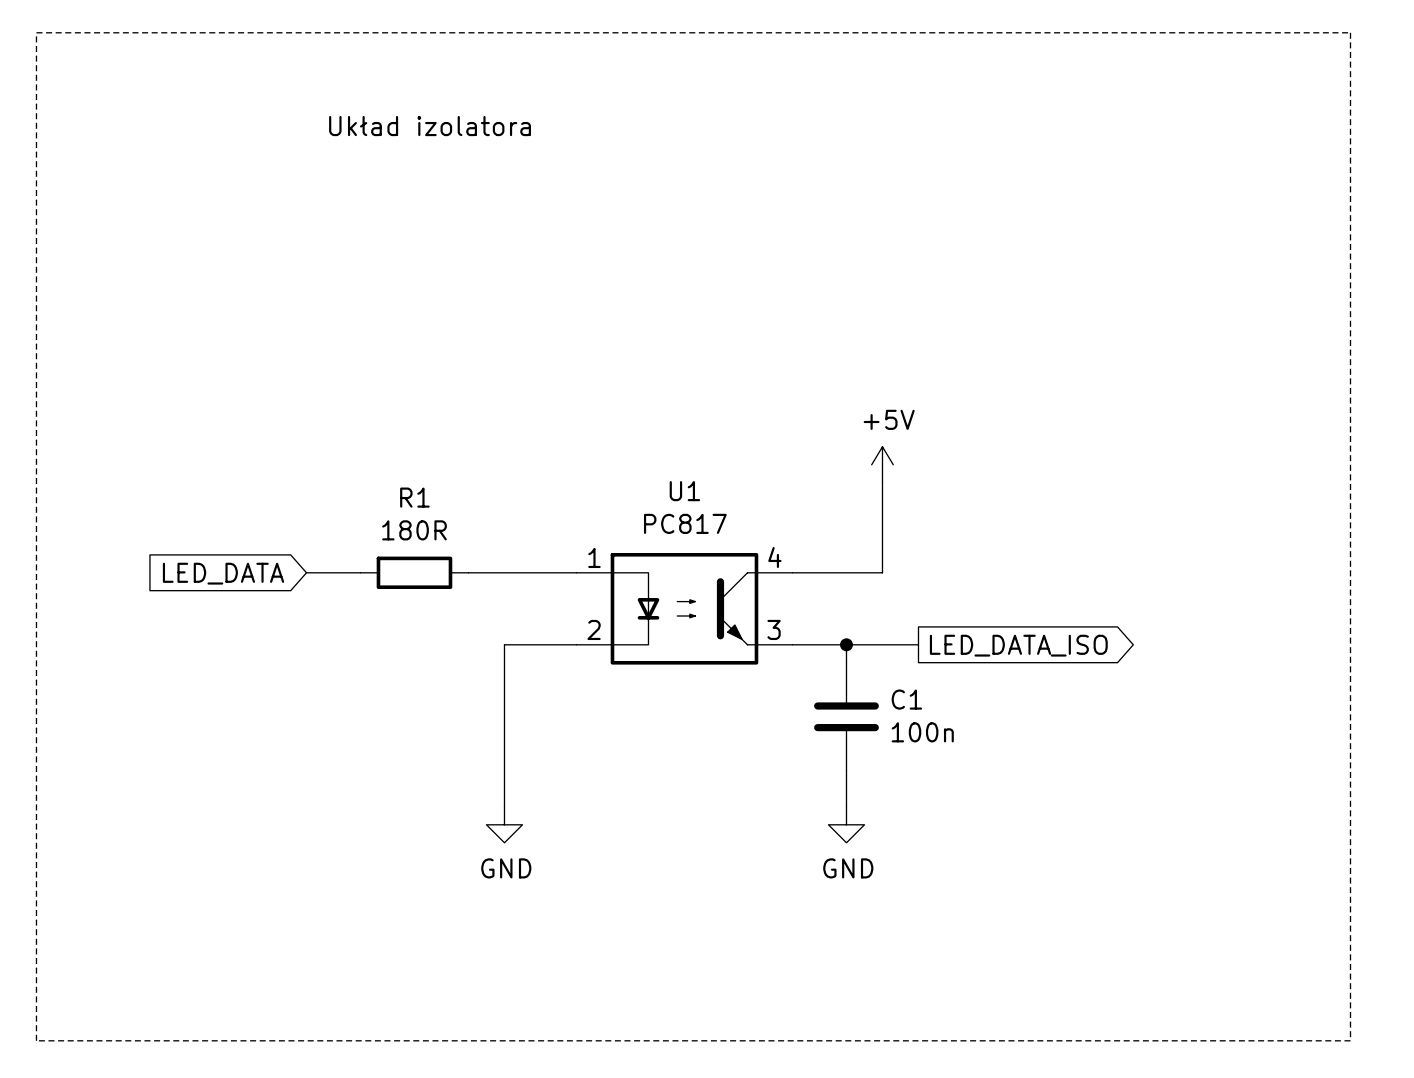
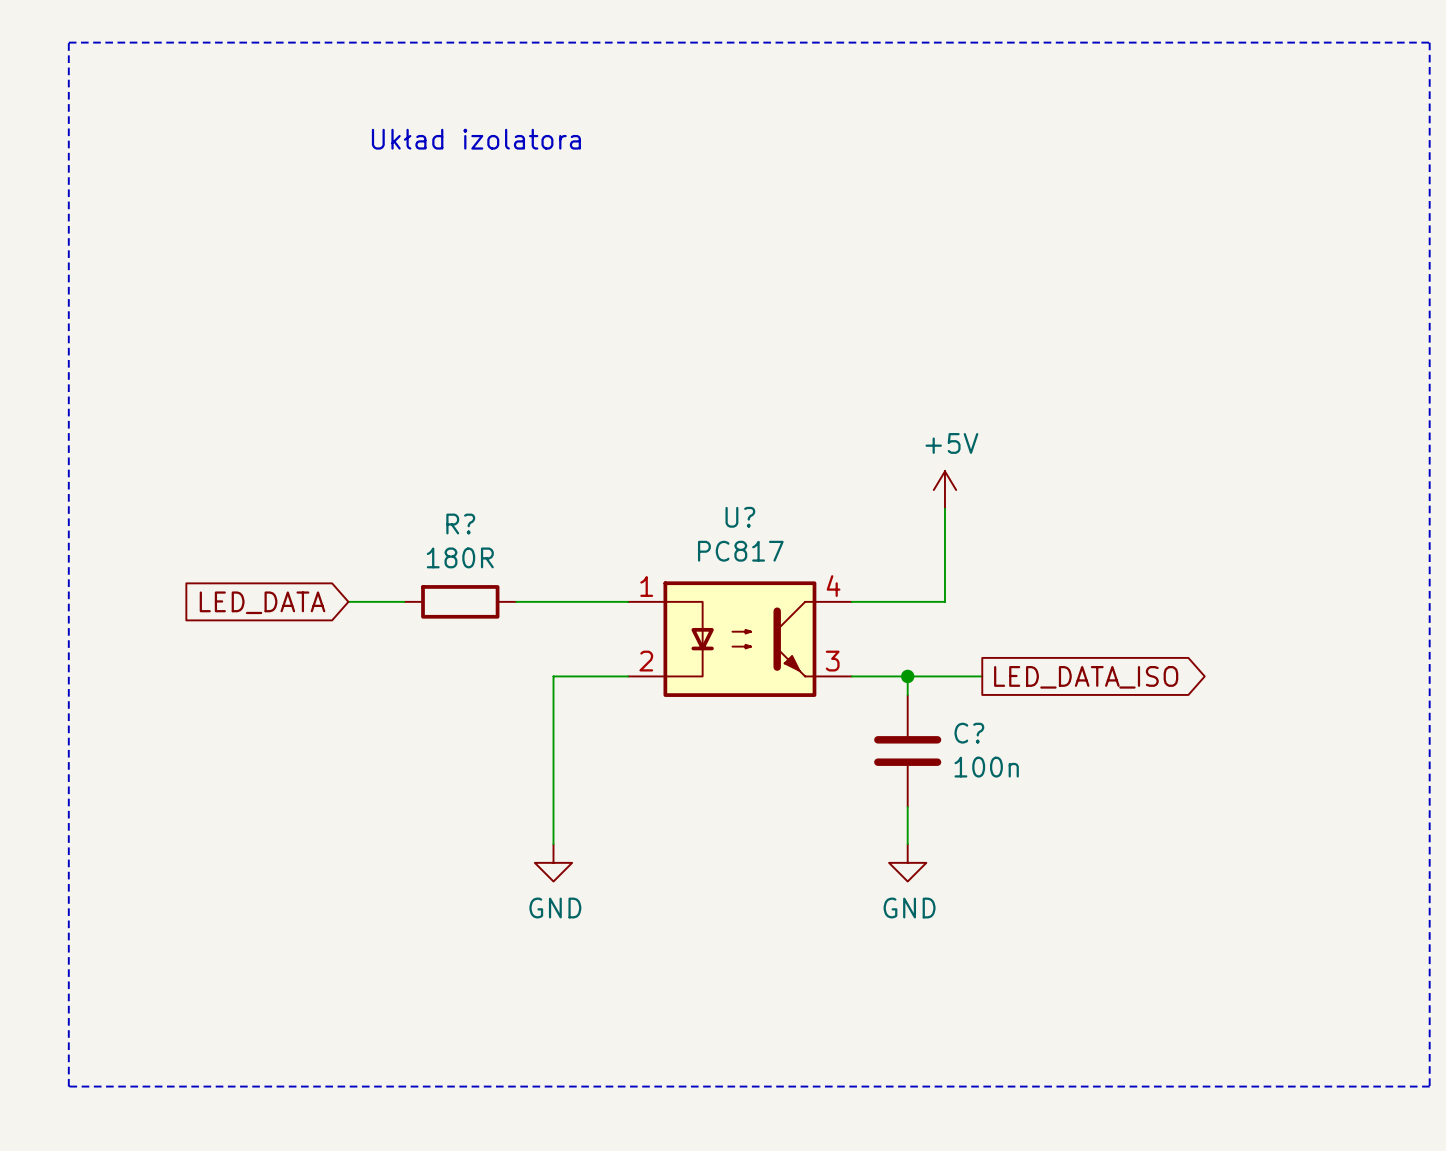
U1 name: U1 (684, 491) -> U? (740, 517)
R1 name: R1 (414, 497) -> R? (460, 523)
C1 name: C1 (906, 699) -> C? (969, 733)

